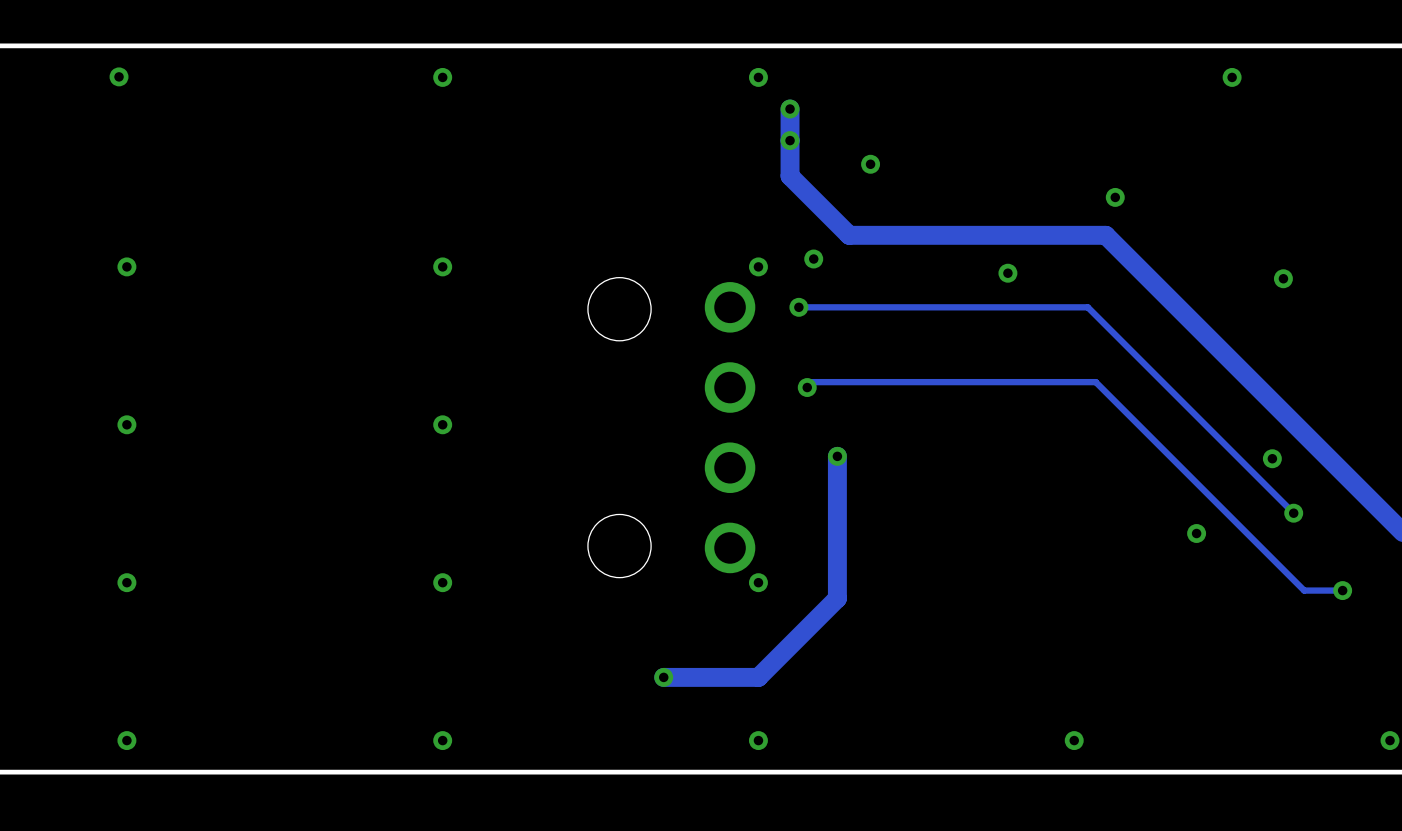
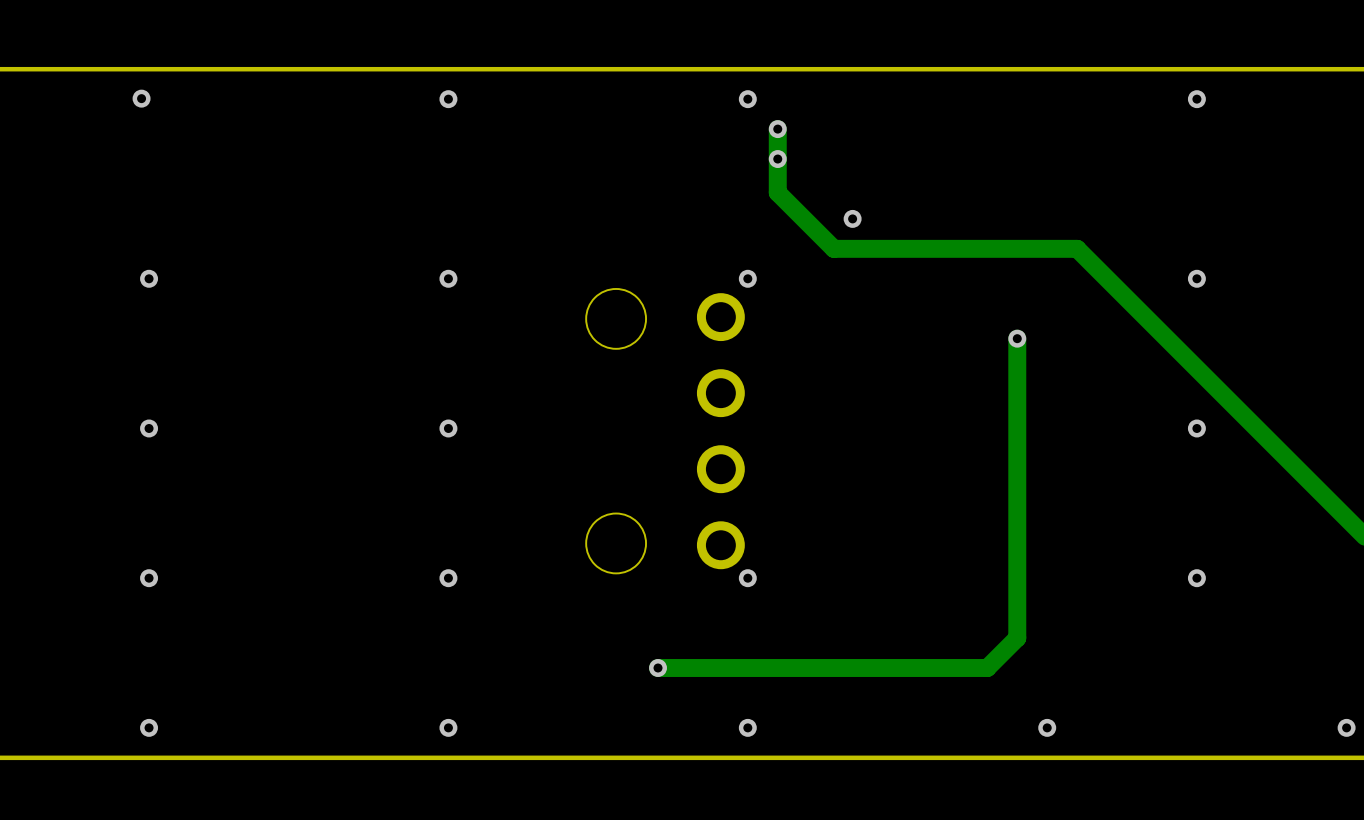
via: (870, 164) -> none
via: (1115, 197) -> none
via: none -> (852, 218)
via: (813, 259) -> none
via position: (1007, 273) -> (1017, 338)
via position: (1283, 278) -> (1196, 278)
track: (798, 307) (1087, 307) (1293, 513) -> none
via: (798, 307) -> none
track: (807, 387) (812, 382) (1095, 382) (1304, 590) (1342, 590) (1344, 592) -> none
via: (807, 387) -> none
track: (837, 456) (837, 598) (758, 677) -> (1017, 338) (1017, 638) (987, 667) (747, 667)
via: (837, 456) -> none
via position: (1272, 458) -> (1196, 428)
via: (1293, 513) -> none
via: (1196, 533) -> none
via: none -> (1196, 578)
via: (1342, 590) -> none

